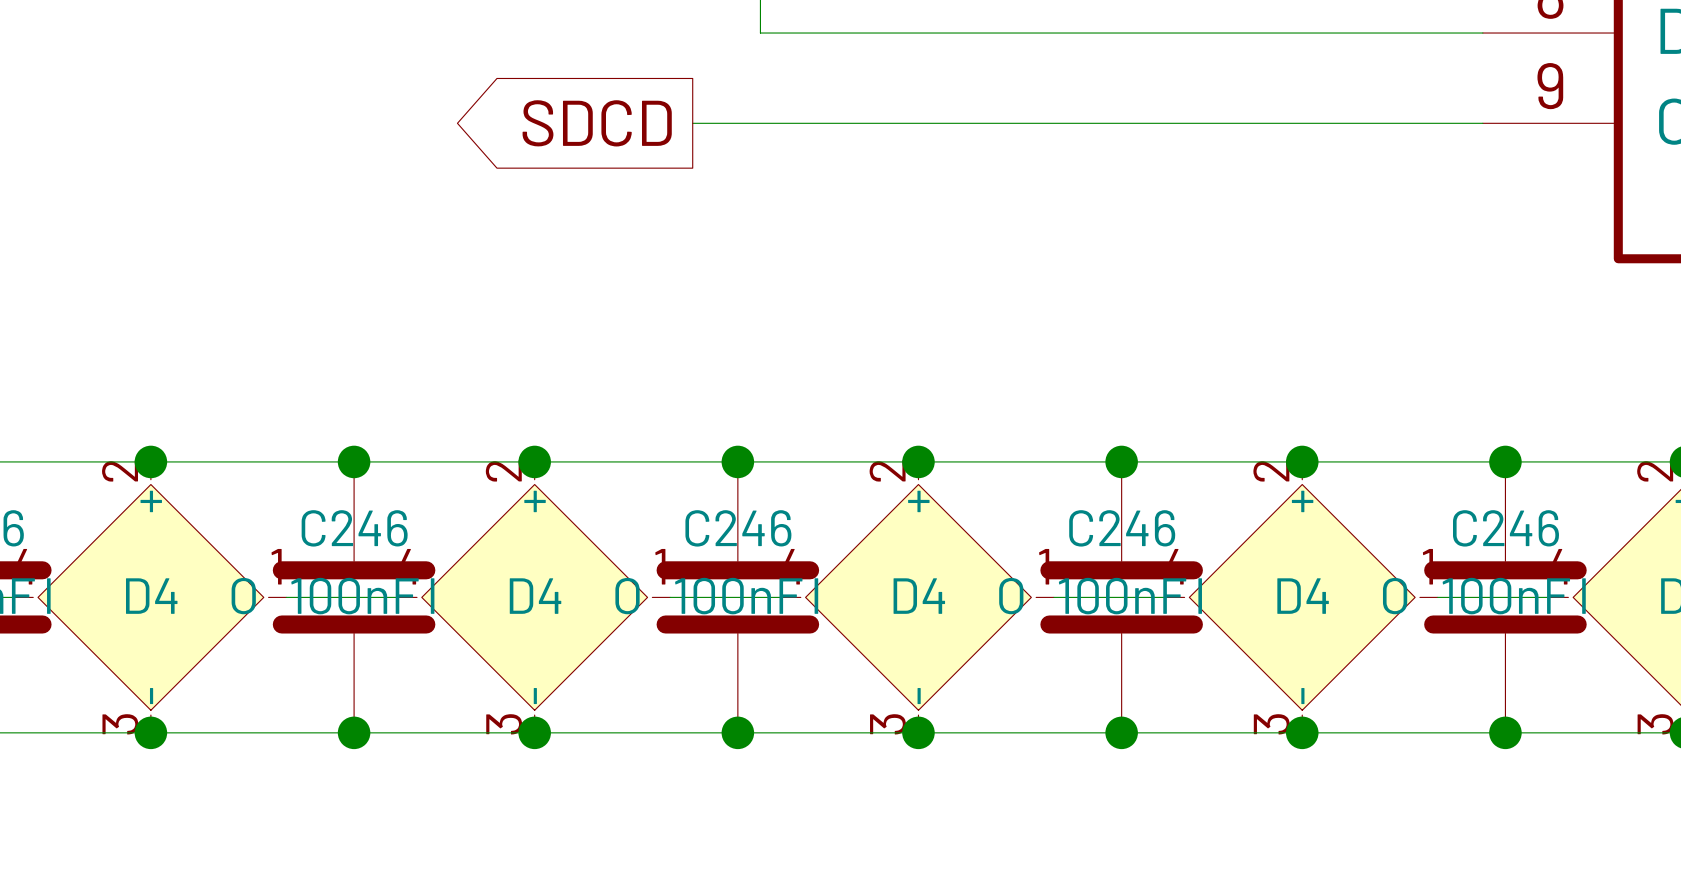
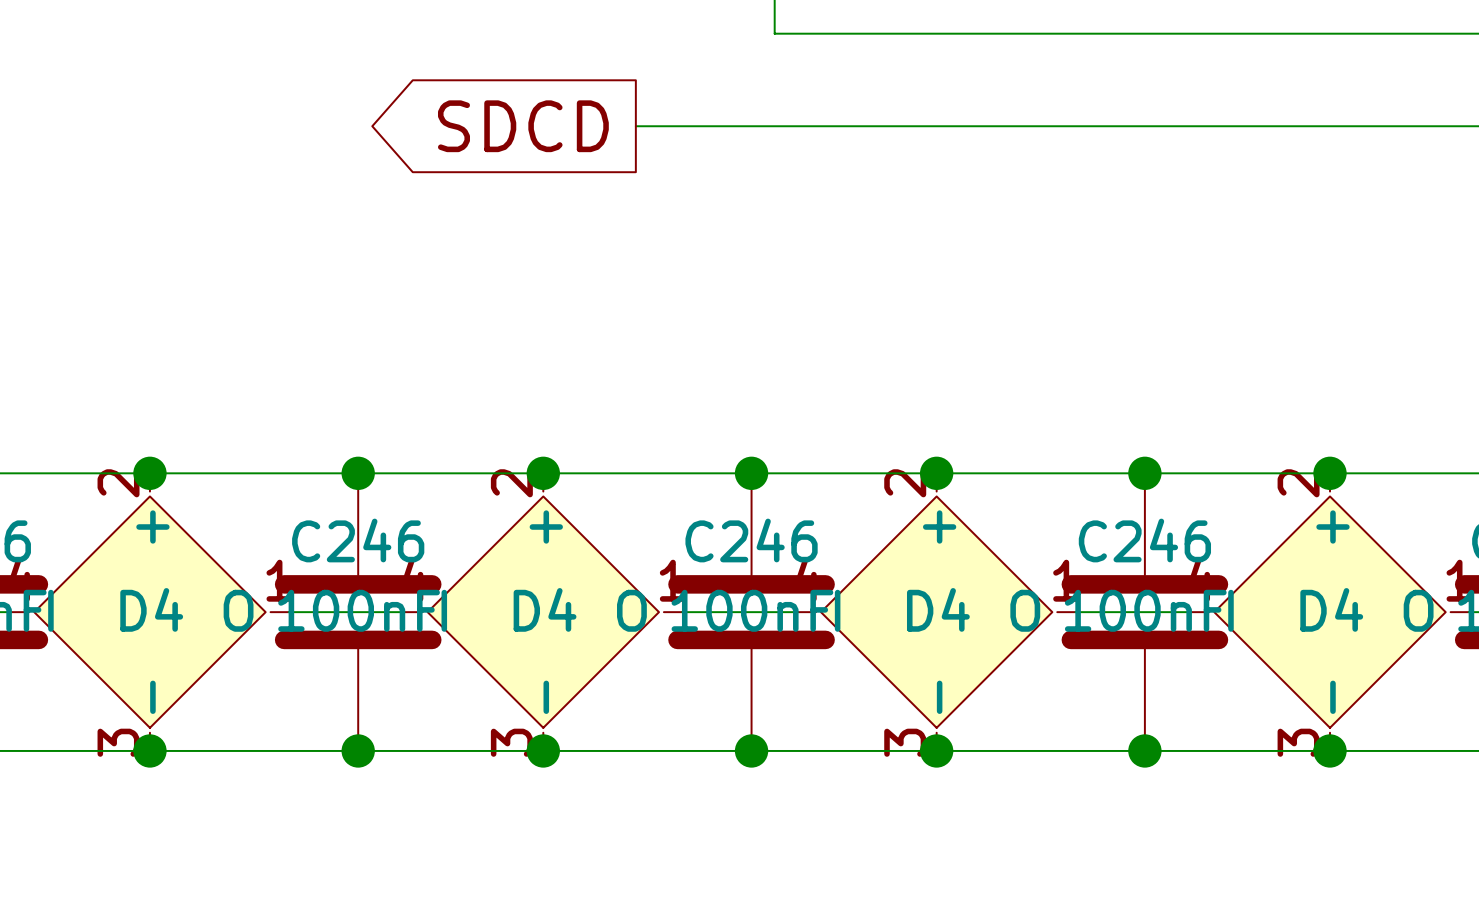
global label position: SDCD (597, 123) -> SDCD (523, 126)
wire: none -> (635, 126) (705, 126)

